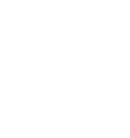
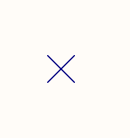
no-connect mark: none -> (61, 68)

